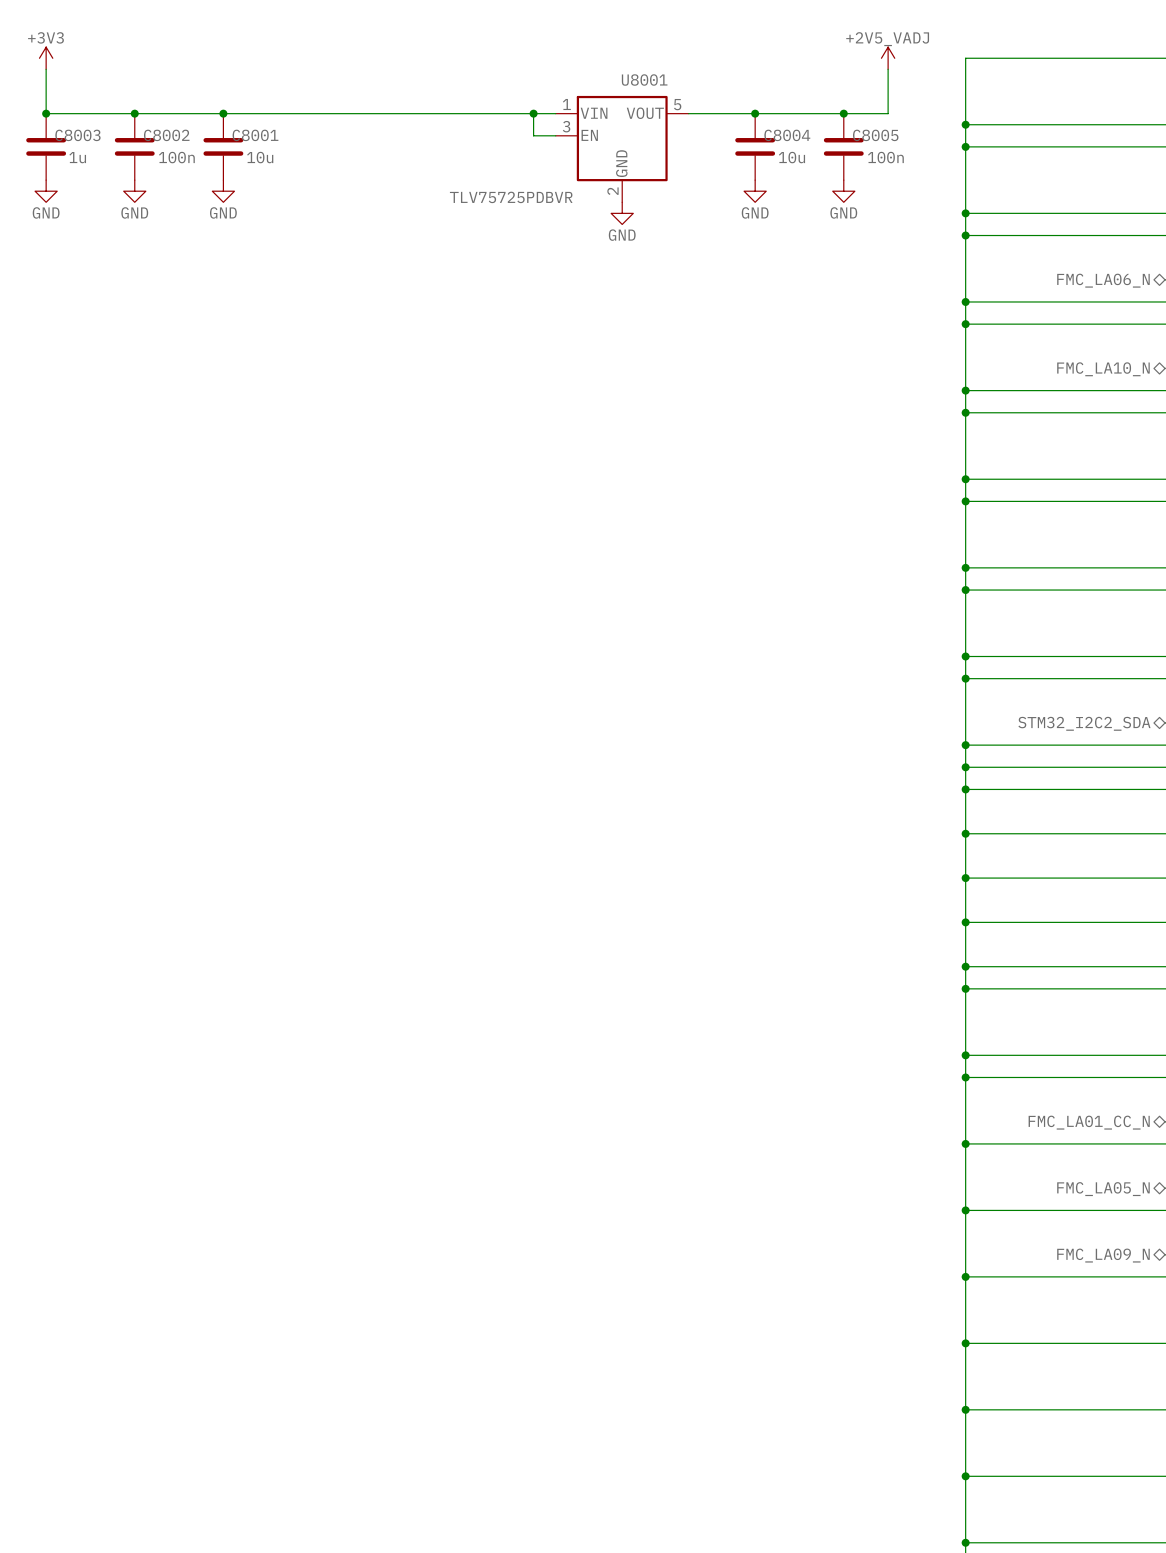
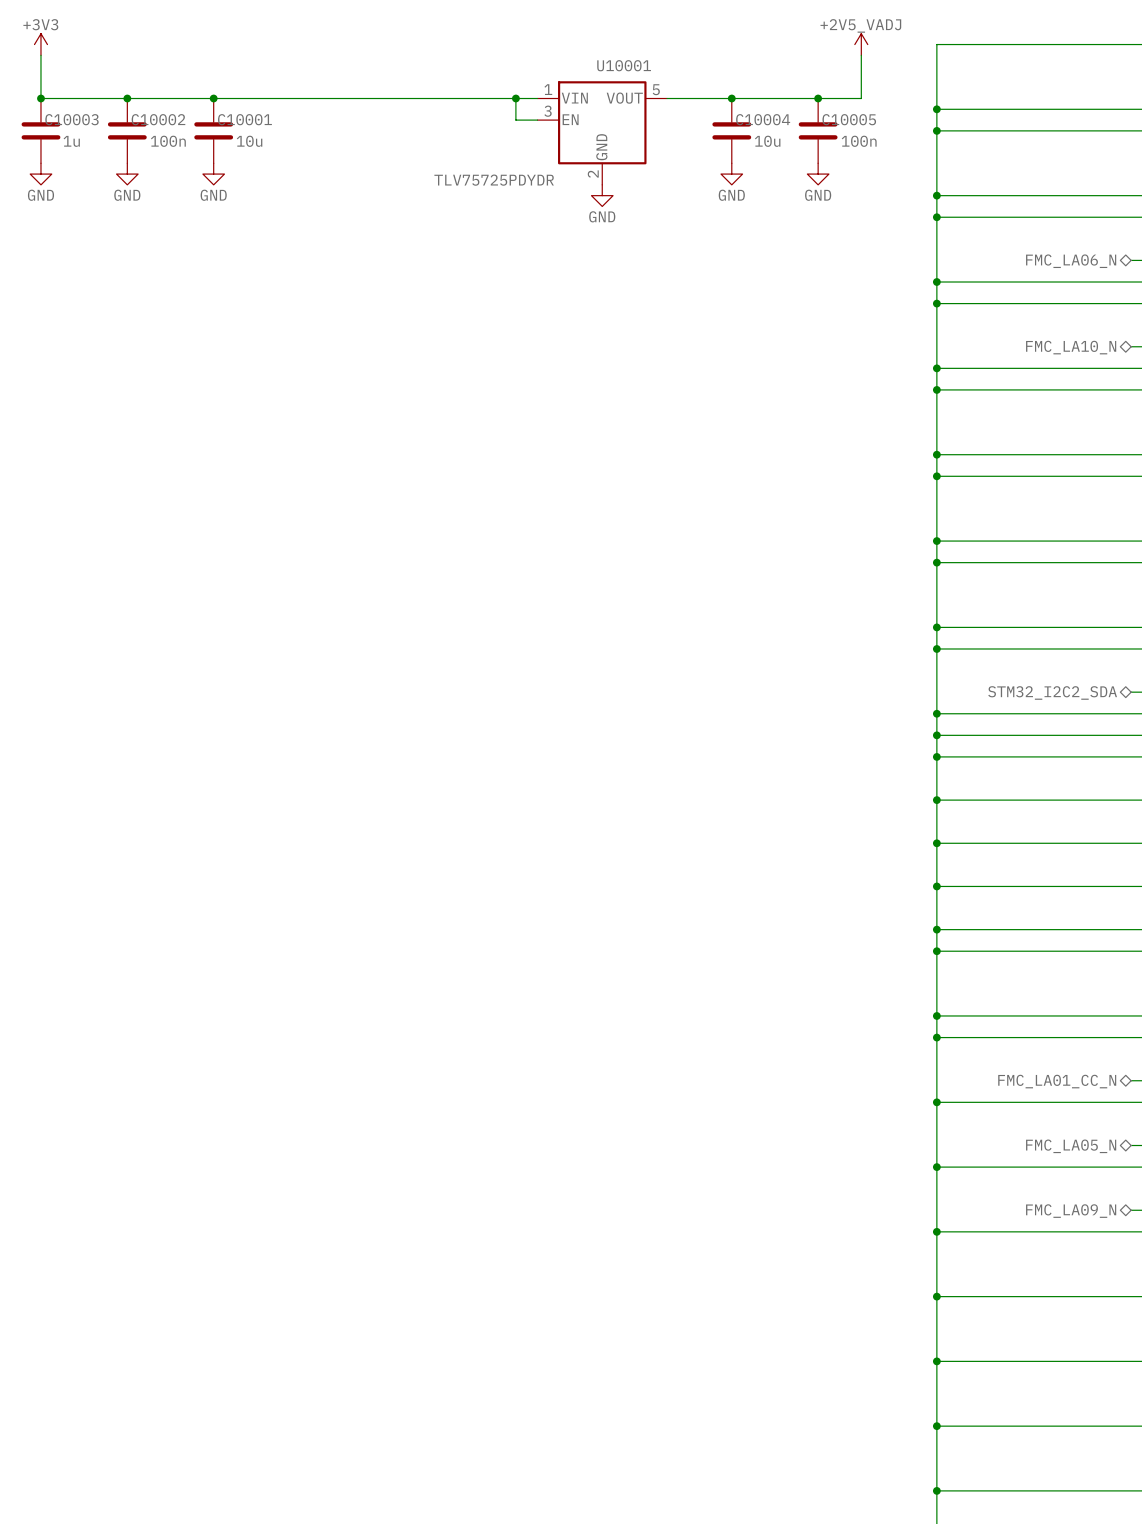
U8001 name: U8001 (644, 80) -> U10001 (624, 65)
C8003 name: C8003 (77, 135) -> C10003 (71, 119)
C8002 name: C8002 (166, 135) -> C10002 (158, 119)
C8001 name: C8001 (255, 135) -> C10001 (244, 119)
C8004 name: C8004 (787, 135) -> C10004 (763, 119)
C8005 name: C8005 (875, 135) -> C10005 (849, 119)
U8001 value: TLV75725PDBVR (511, 197) -> TLV75725PDYDR (494, 180)

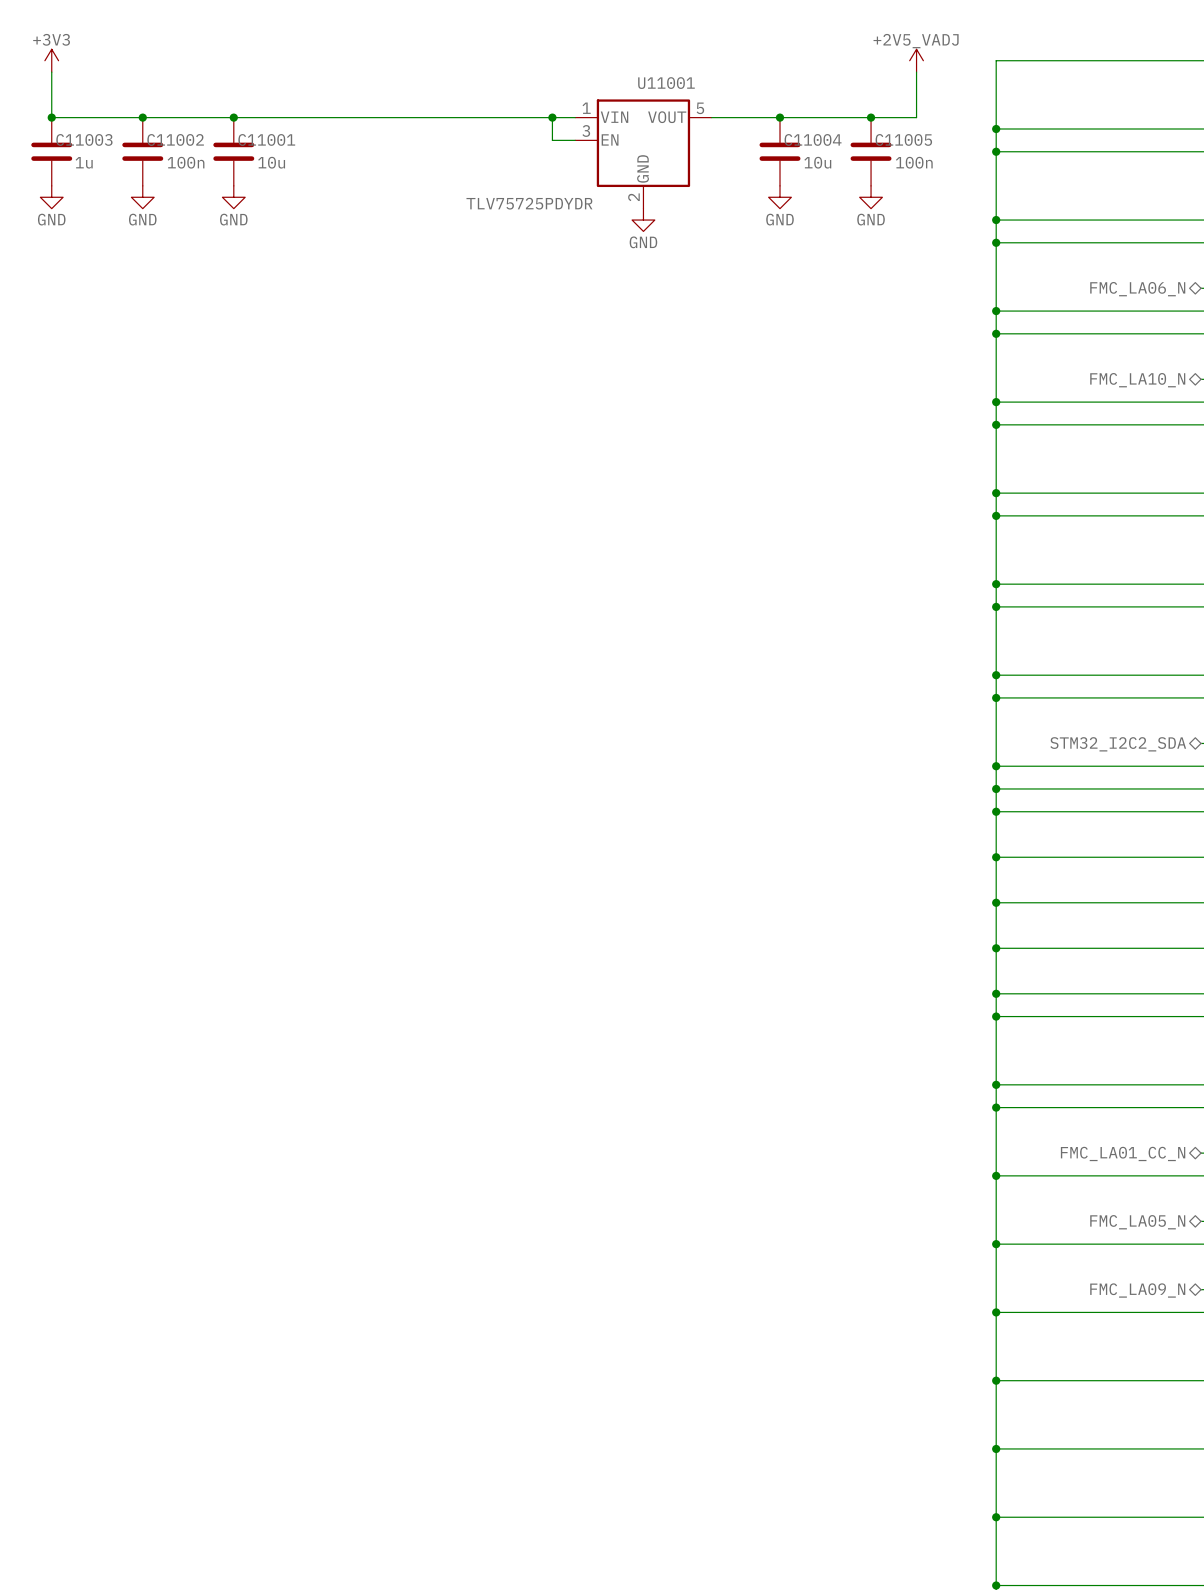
U10001 name: U10001 (624, 65) -> U11001 (666, 83)
C10003 name: C10003 (71, 119) -> C11003 (84, 139)
C10002 name: C10002 (158, 119) -> C11002 (175, 139)
C10001 name: C10001 (244, 119) -> C11001 (266, 139)
C10004 name: C10004 (763, 119) -> C11004 (813, 139)
C10005 name: C10005 (849, 119) -> C11005 (903, 139)

